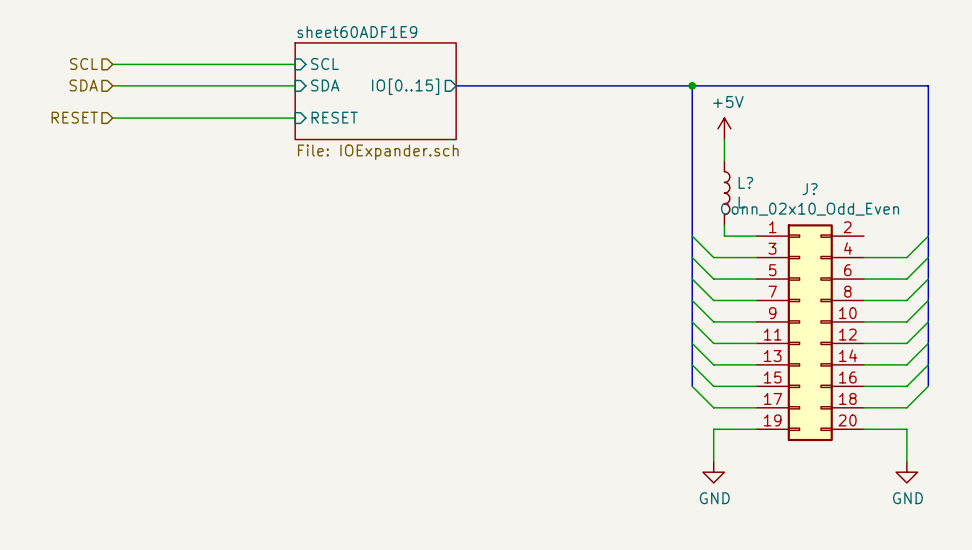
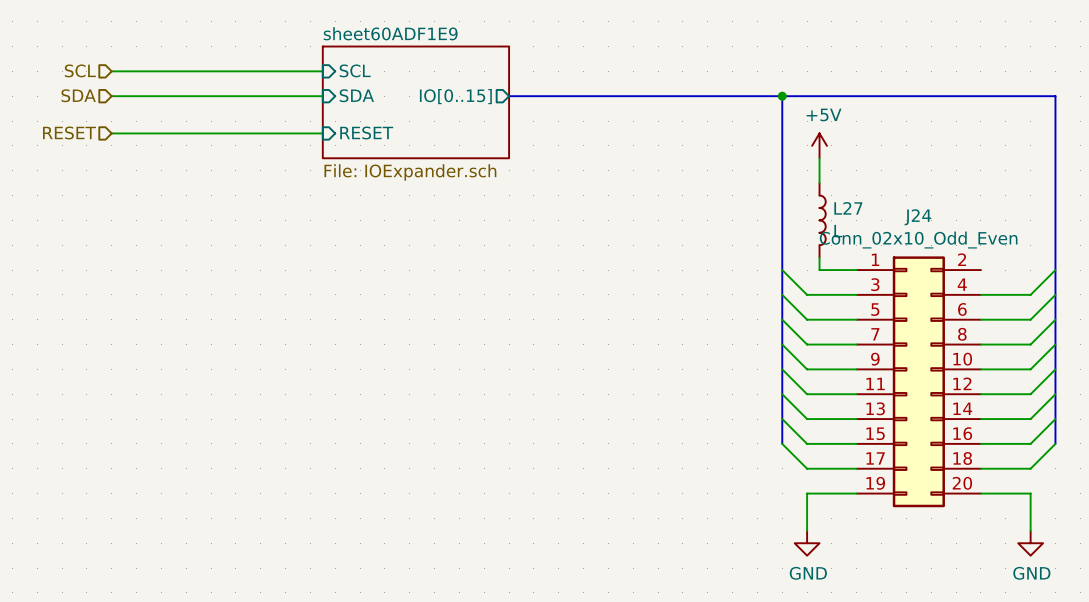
L? name: L? (745, 182) -> L27 (848, 208)
J? name: J? (810, 189) -> J24 (917, 217)

